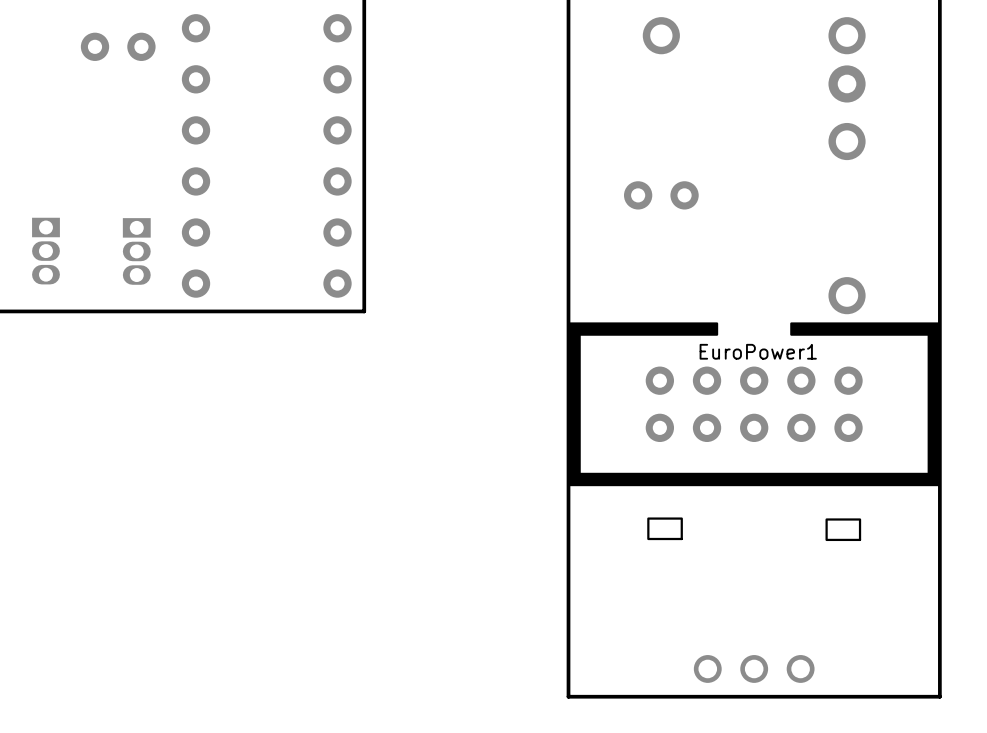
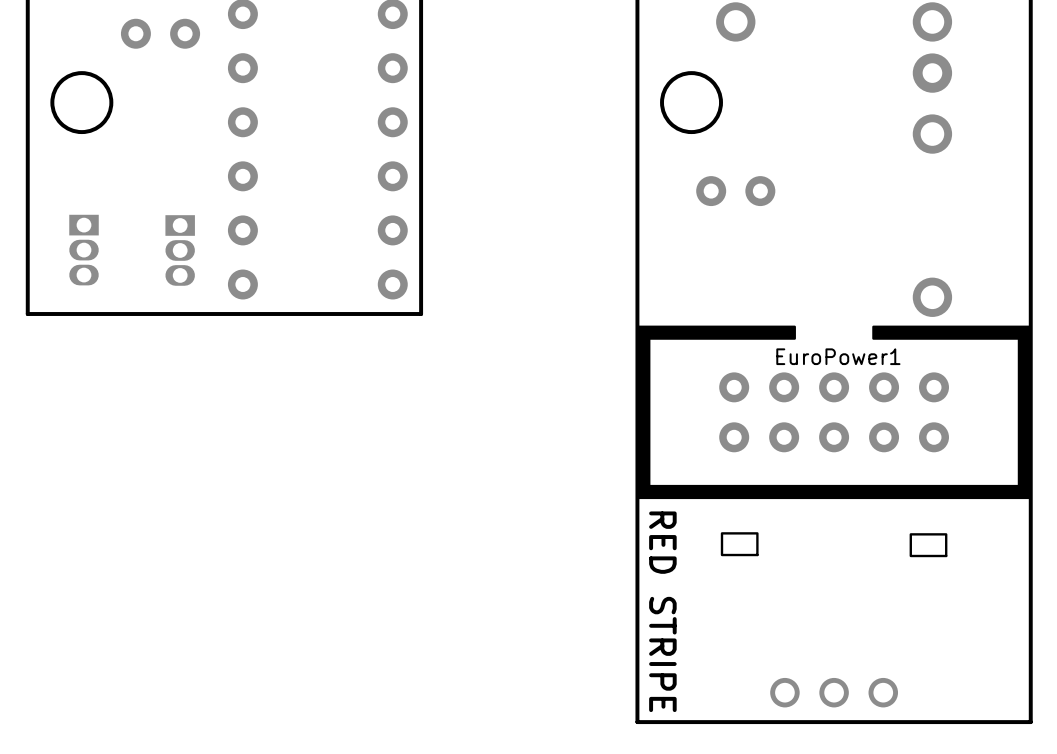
round board edge: none -> [50, 71, 114, 135]
round board edge: none -> [660, 71, 723, 135]
text: none -> RED STRIPE (662, 611)

